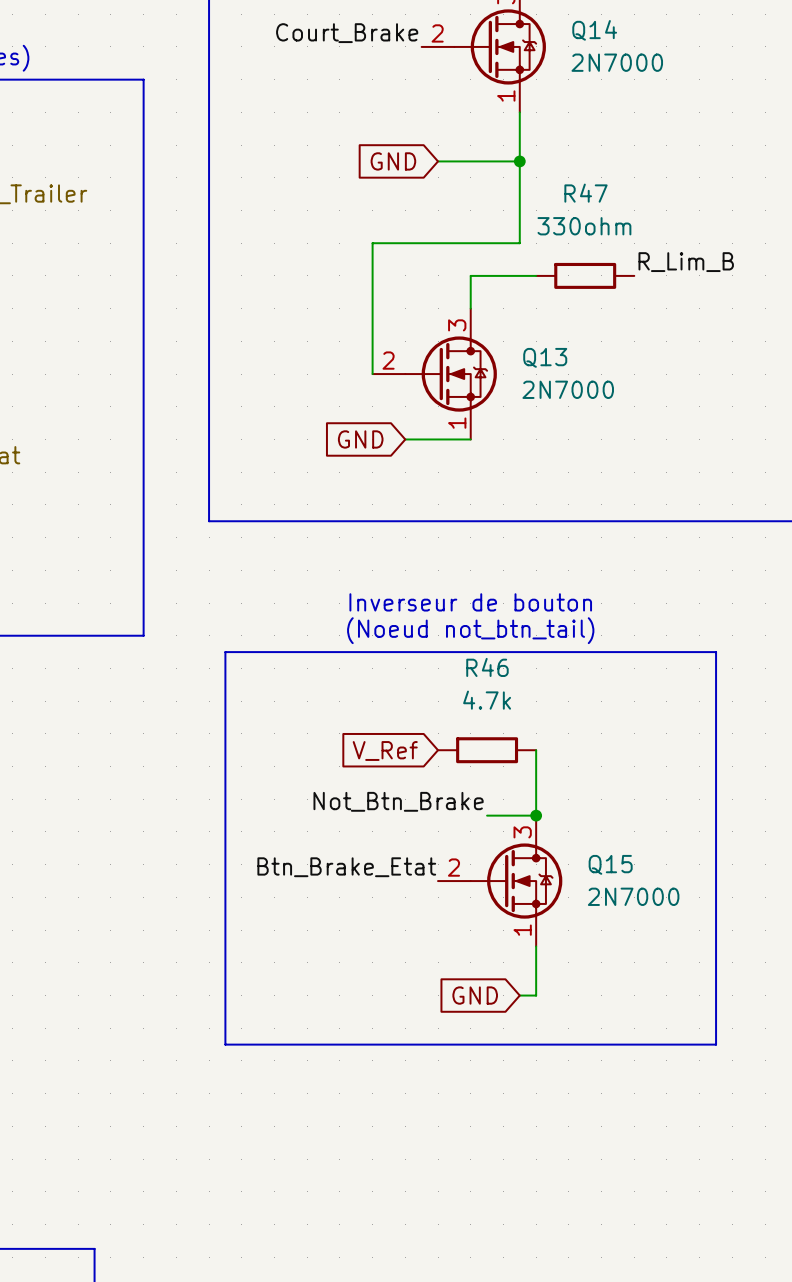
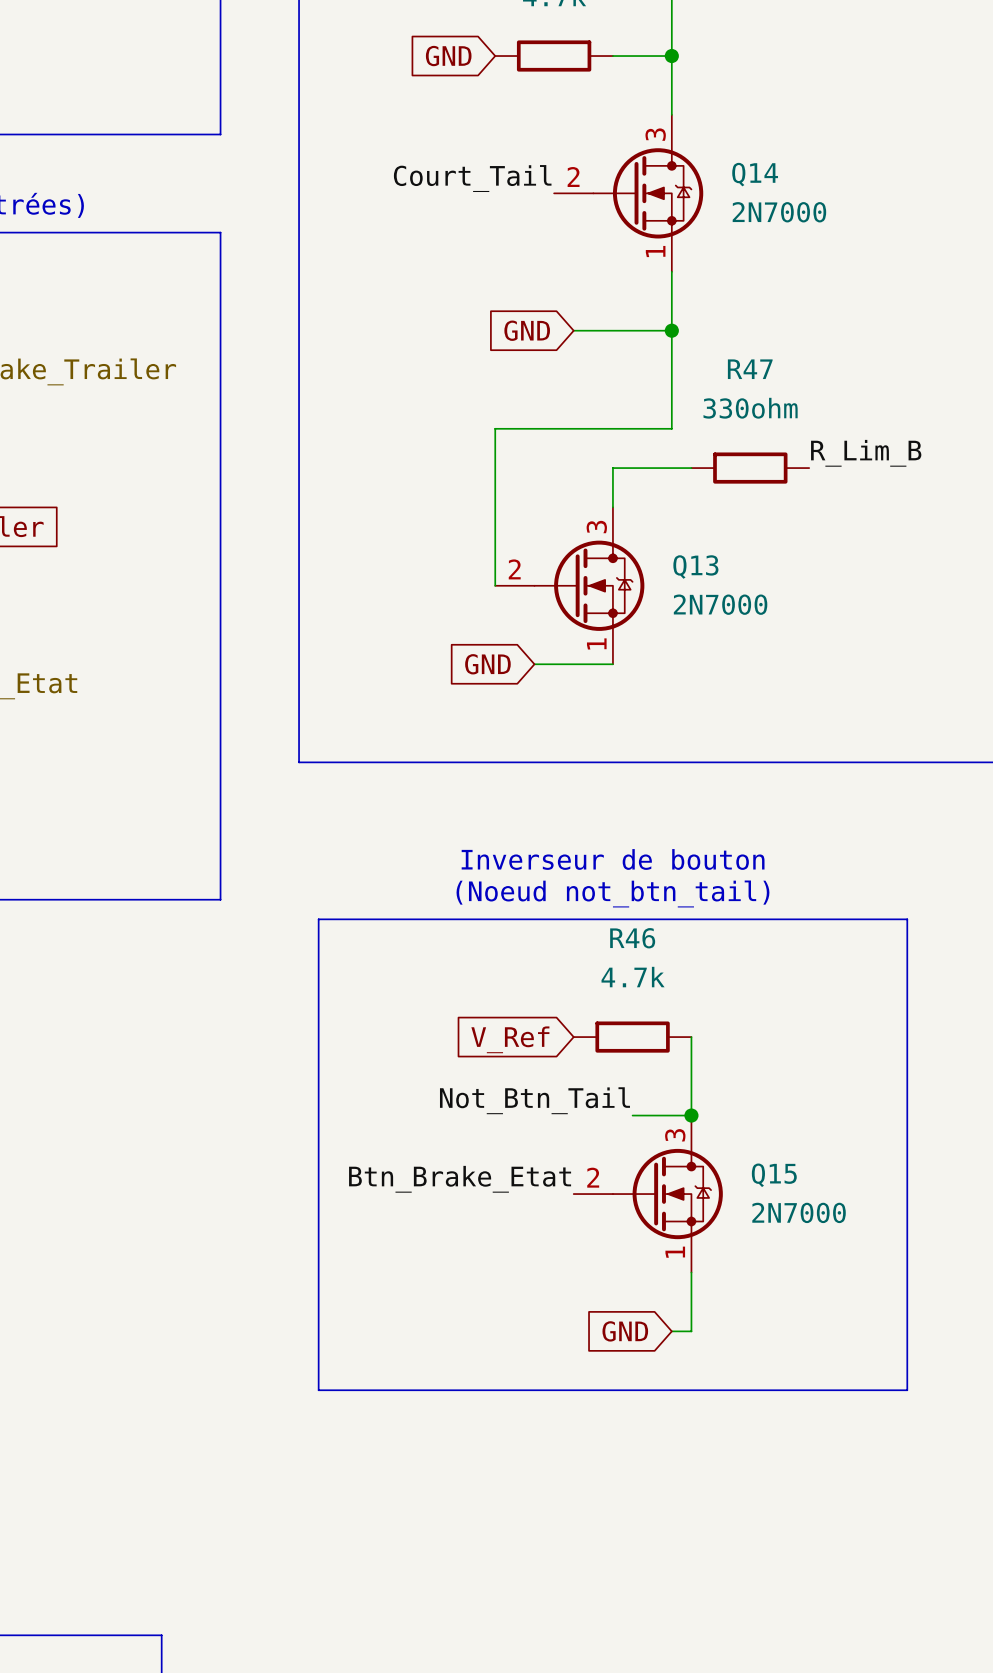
label: Court_Brake (347, 33) -> Court_Tail (472, 178)
label: Not_Btn_Brake (398, 801) -> Not_Btn_Tail (534, 1100)

